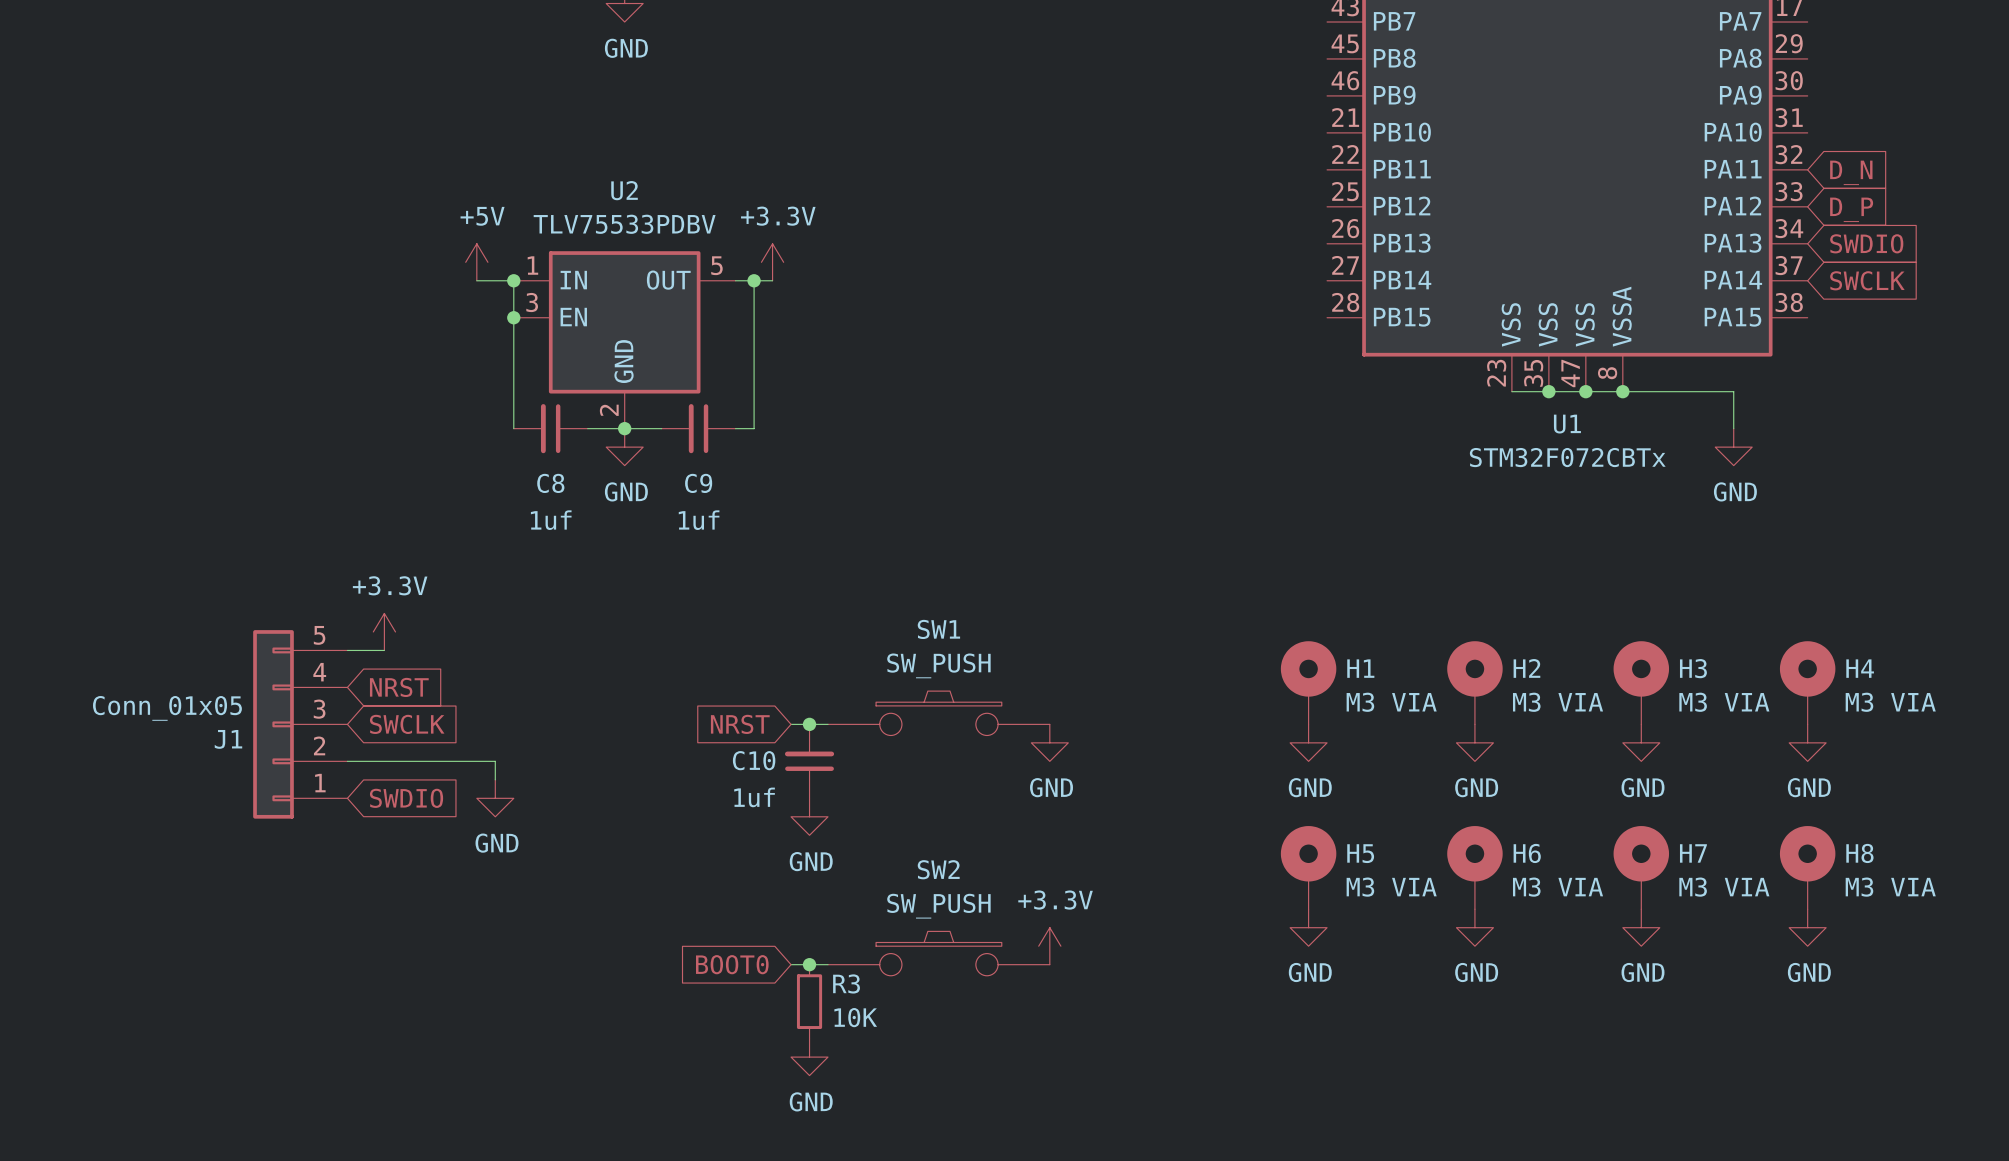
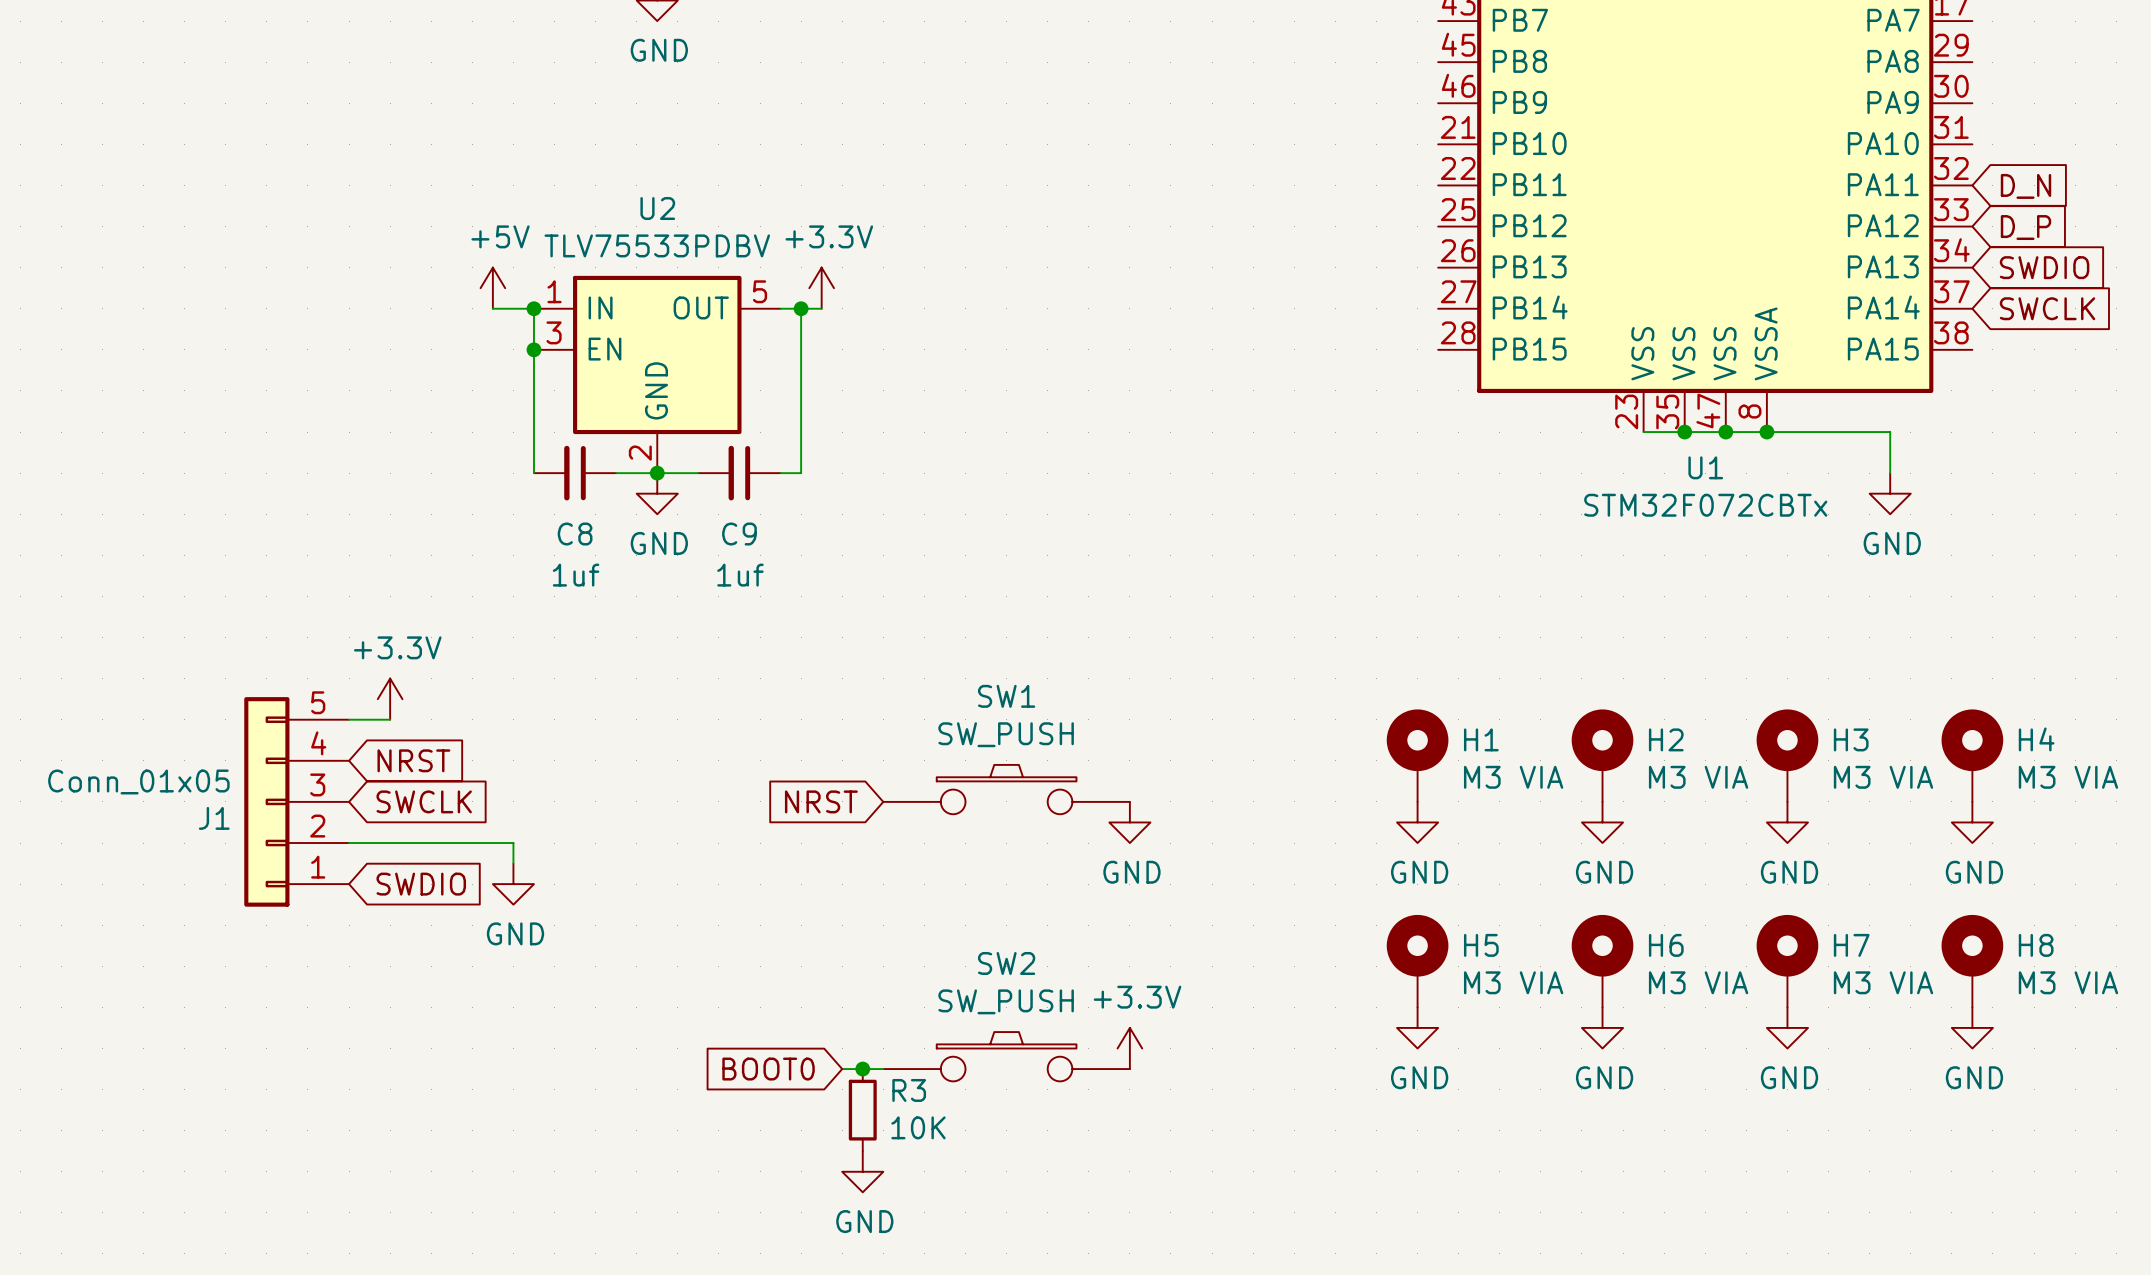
global label position: NRST (740, 724) -> NRST (821, 801)
wire: (791, 724) (828, 724) -> none
junction: (809, 724) -> none
C10: 1uf (809, 761) -> none
power symbol: GND (809, 816) -> none

